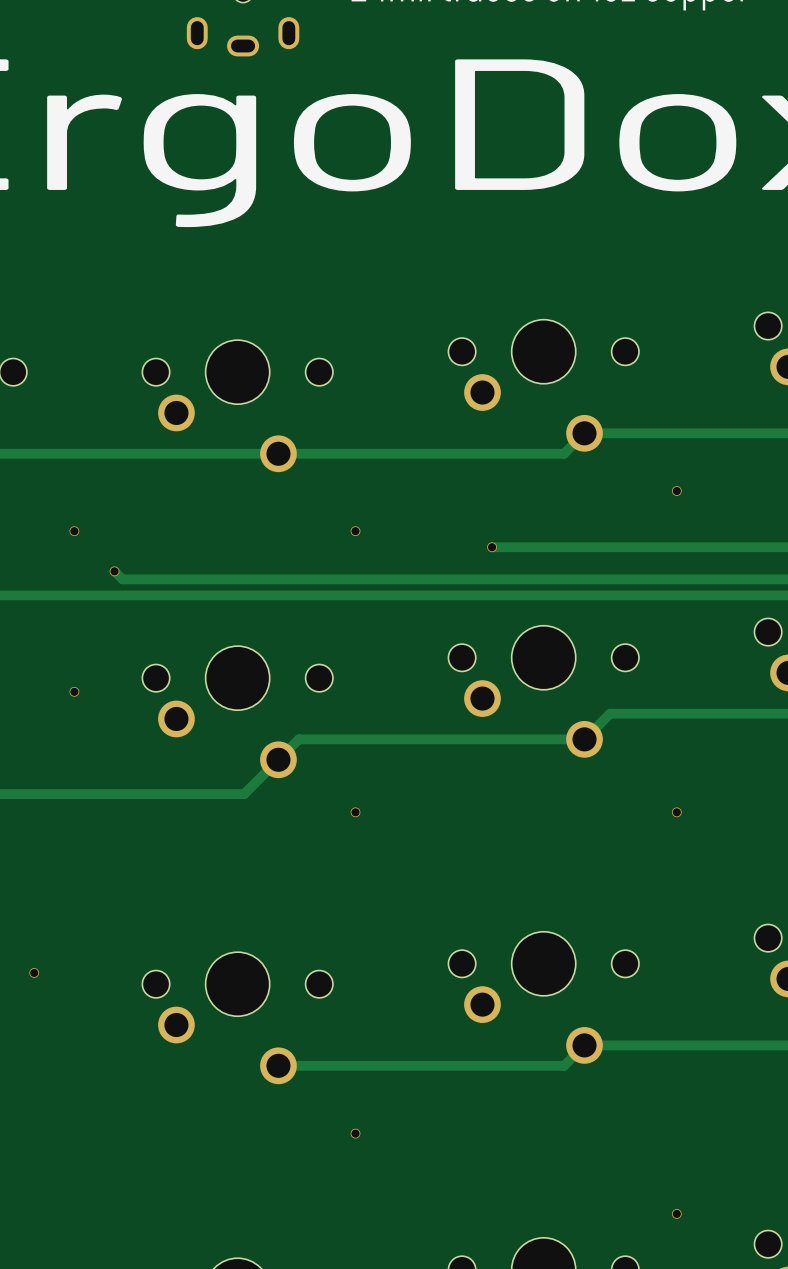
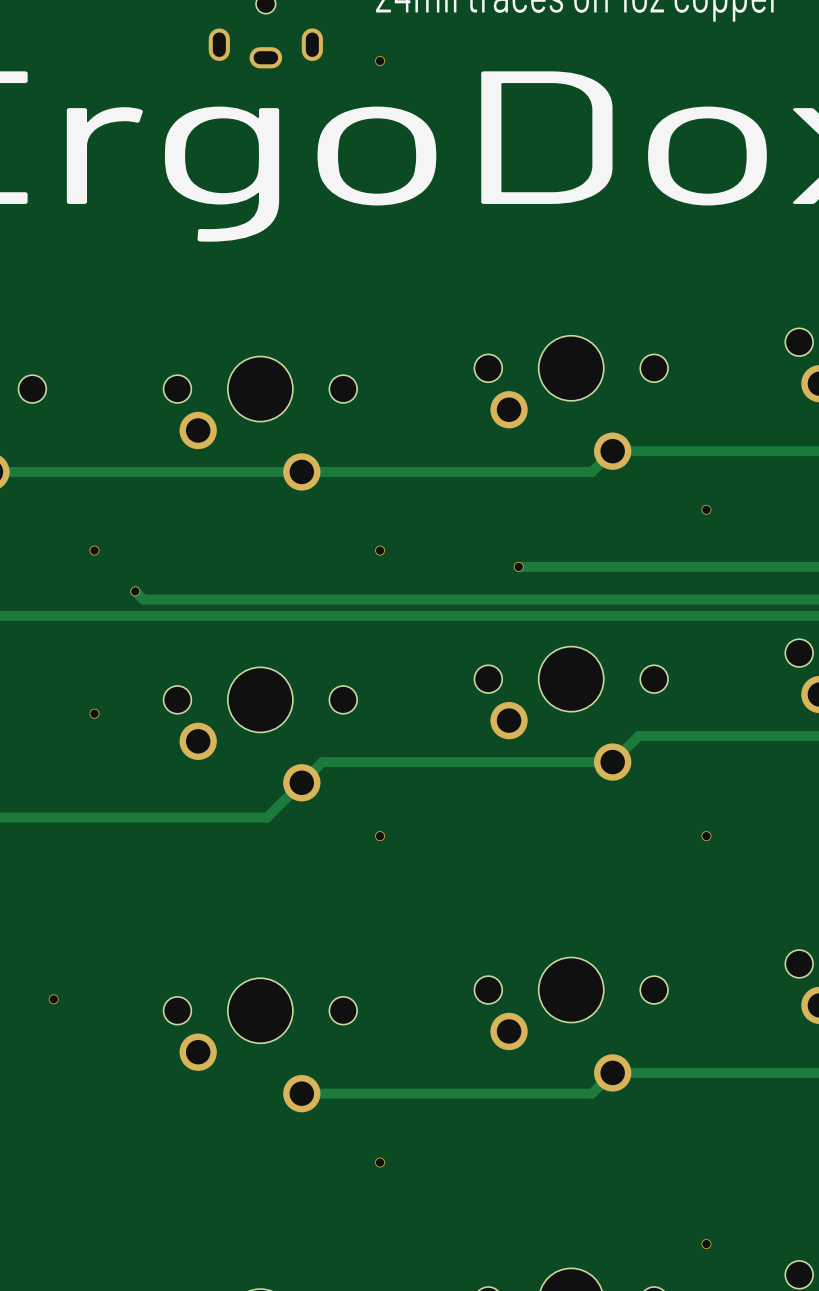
via: none -> (380, 61)

